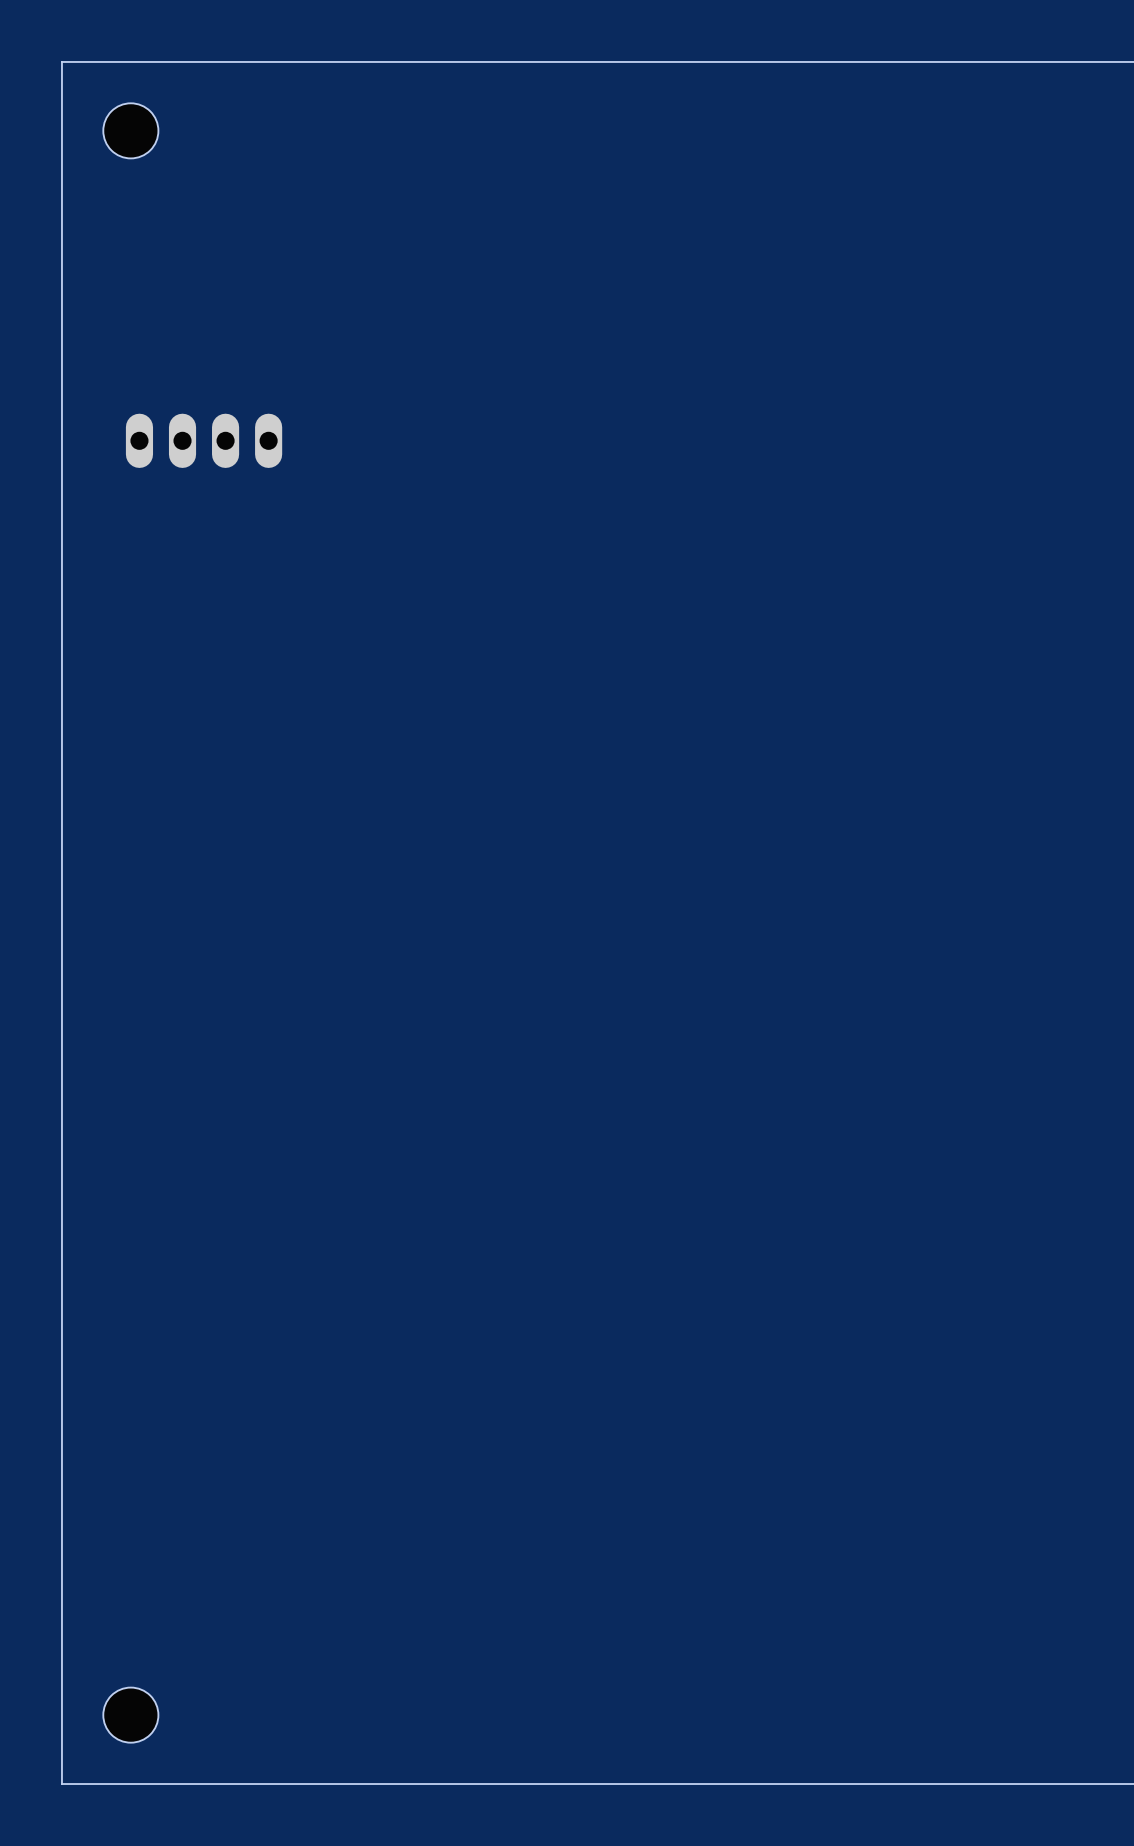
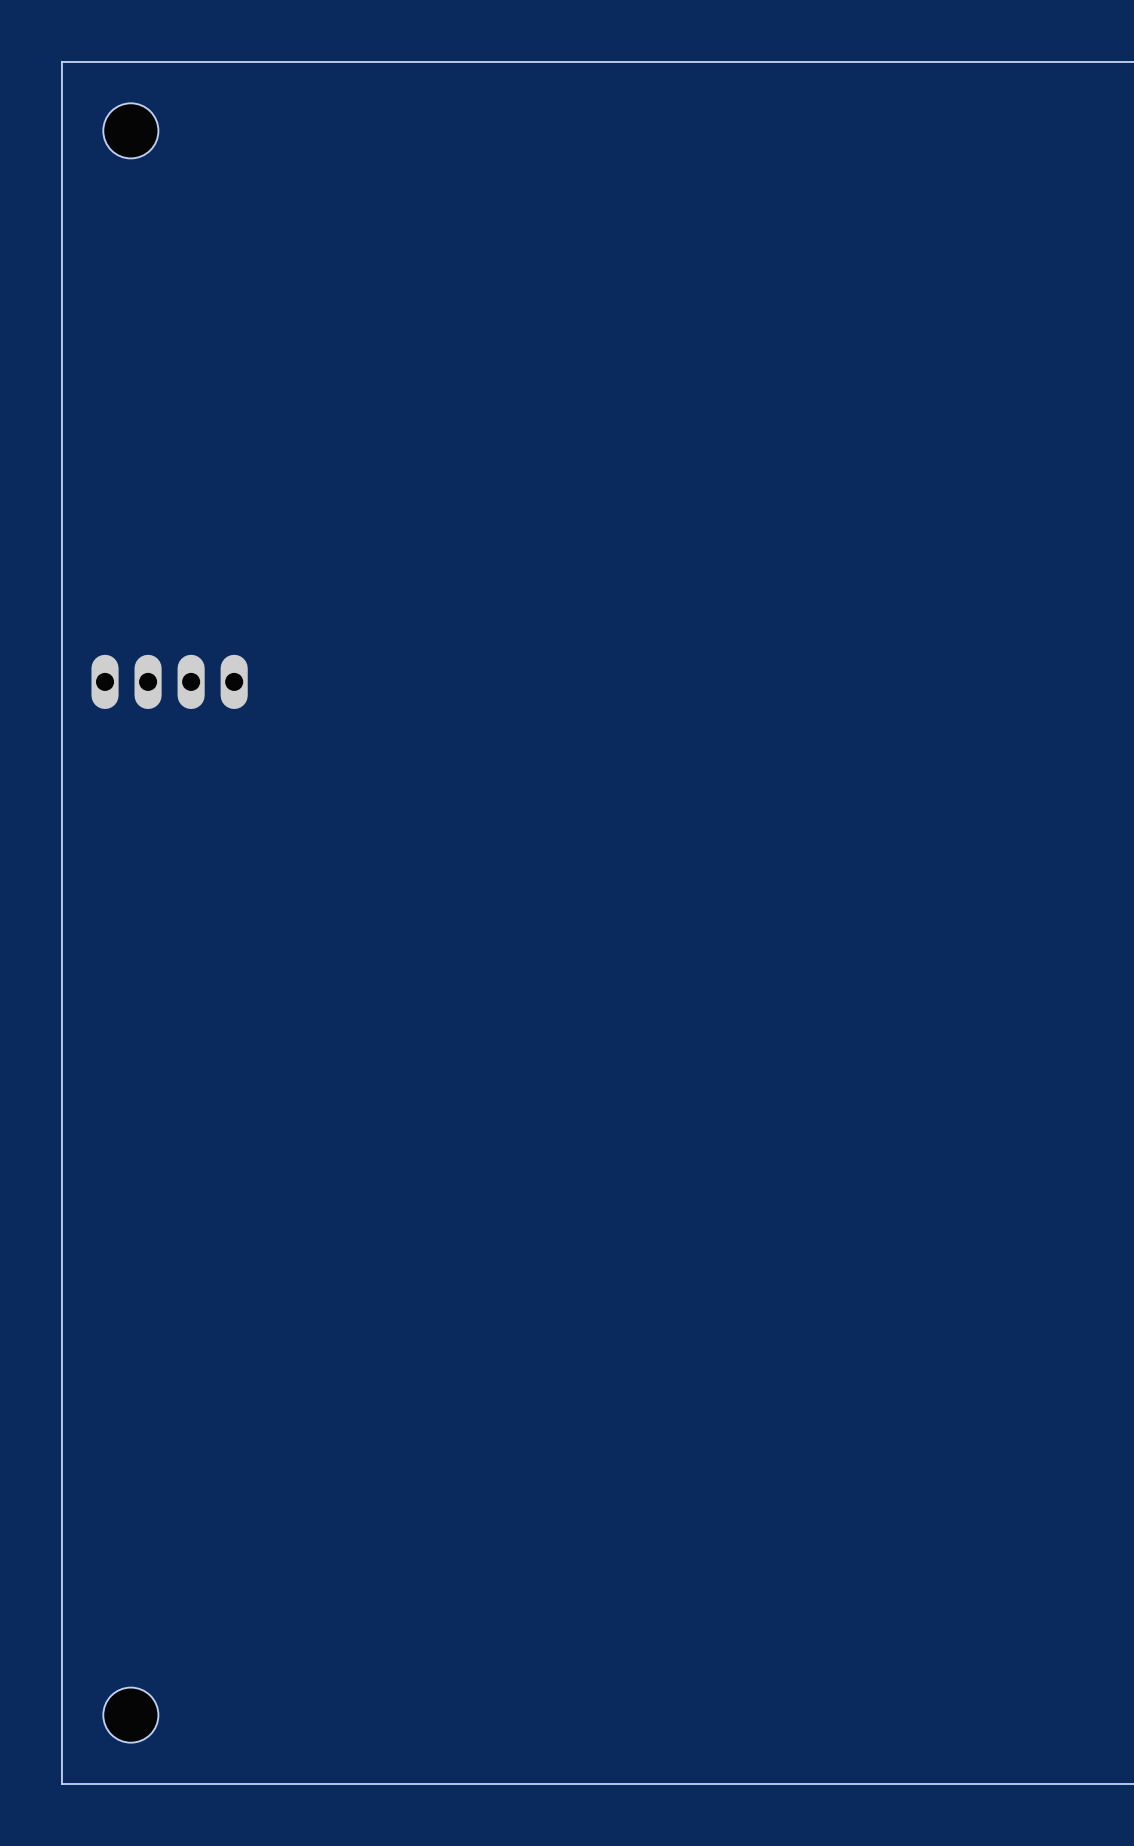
part position: (204, 440) -> (169, 681)

